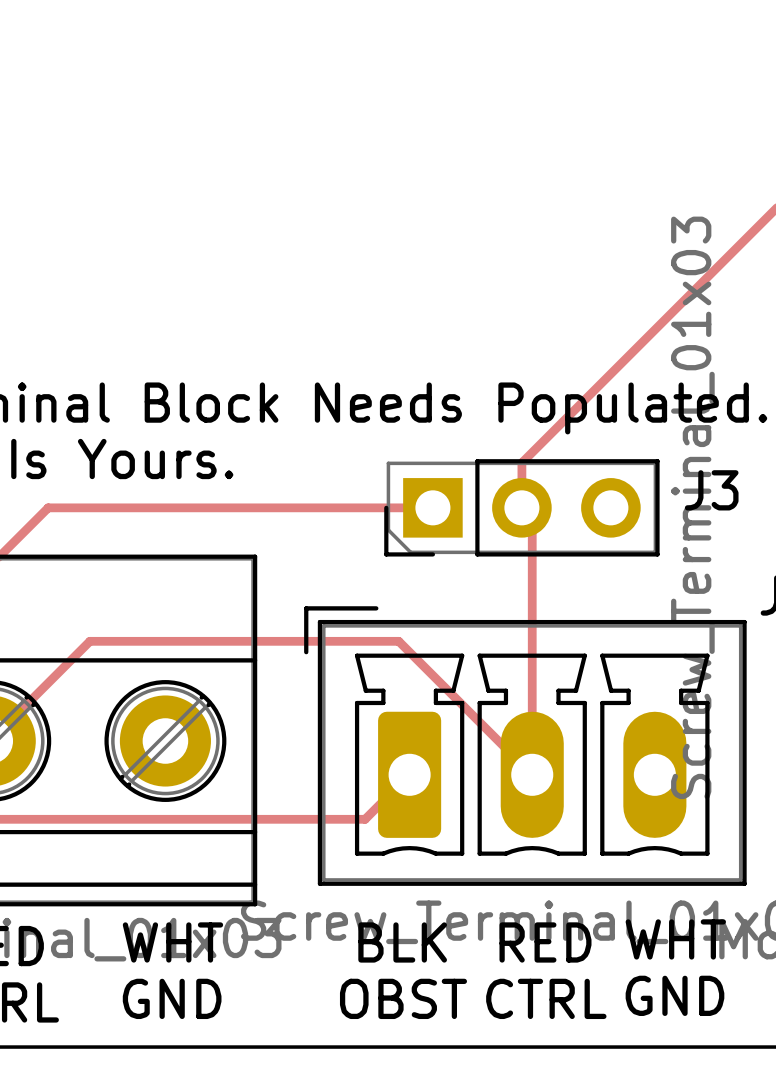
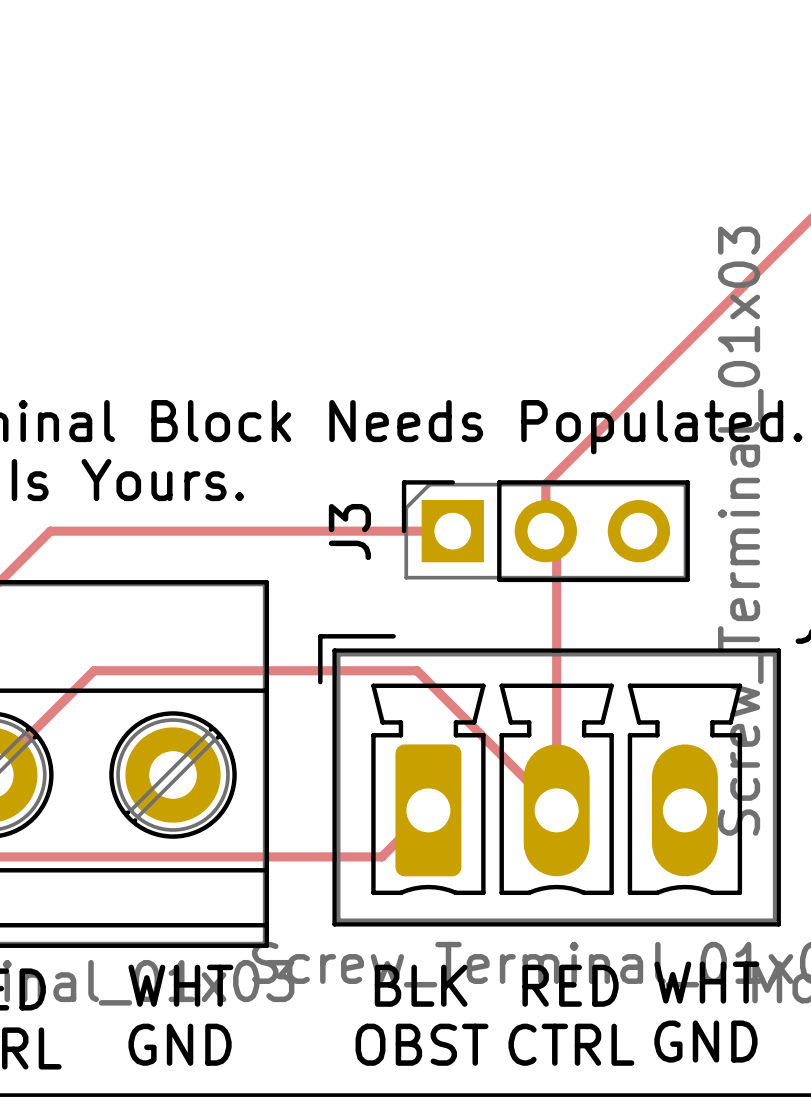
J3 footprint: [384, 459, 660, 557] -> [401, 480, 690, 583]
J3 name position: J3 (711, 490) -> J3 (349, 532)

